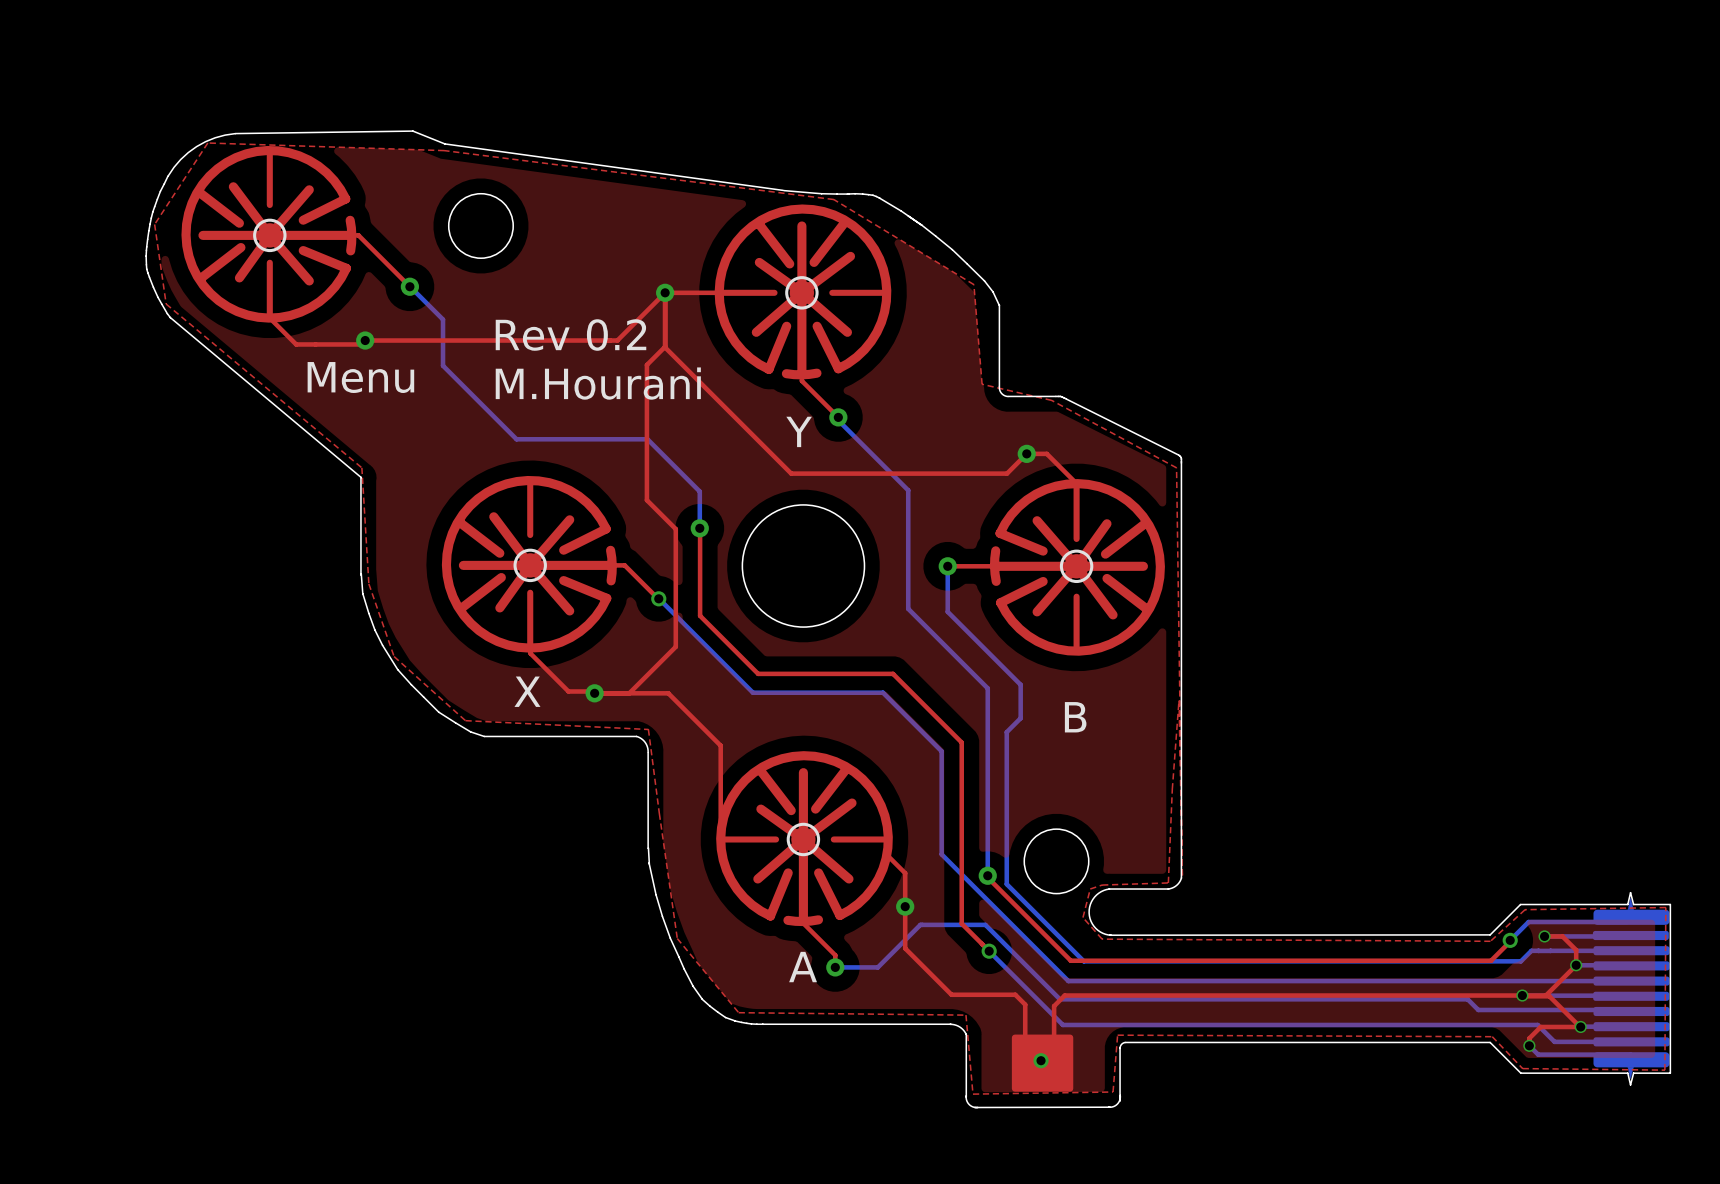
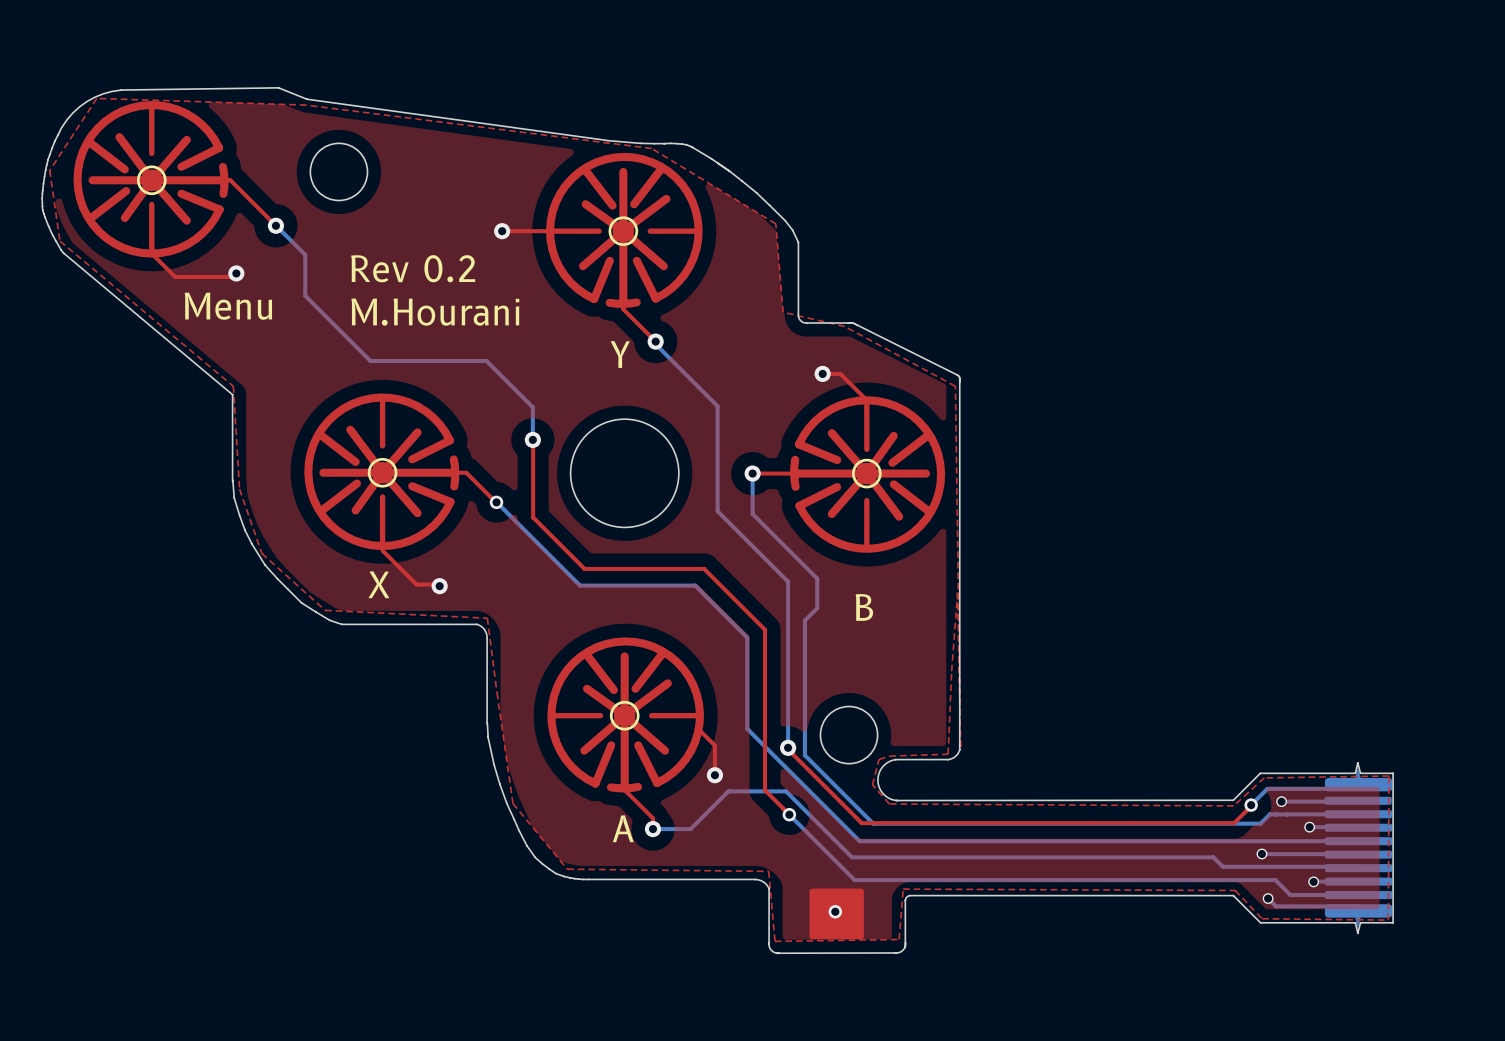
top track: (365, 340) (617, 340) (665, 292) (665, 347) (791, 473) (1007, 473) (1026, 453) -> none
top track: (665, 346) (646, 364) (646, 500) (675, 529) (675, 646) (629, 693) -> none
top track: (594, 693) (668, 693) (720, 745) (720, 839) -> none
top track: (905, 906) (905, 948) (951, 994) (1015, 994) (1025, 1004) (1025, 1045) (1043, 1062) -> none
top track: (1544, 936) (1562, 936) (1576, 950) (1576, 965) (1545, 995) (1064, 995) (1054, 1006) (1054, 1051) (1042, 1063) -> none
top track: (1522, 995) (1549, 996) (1580, 1026) -> none
top track: (1580, 1026) (1540, 1026) (1529, 1038) (1529, 1045) -> none

